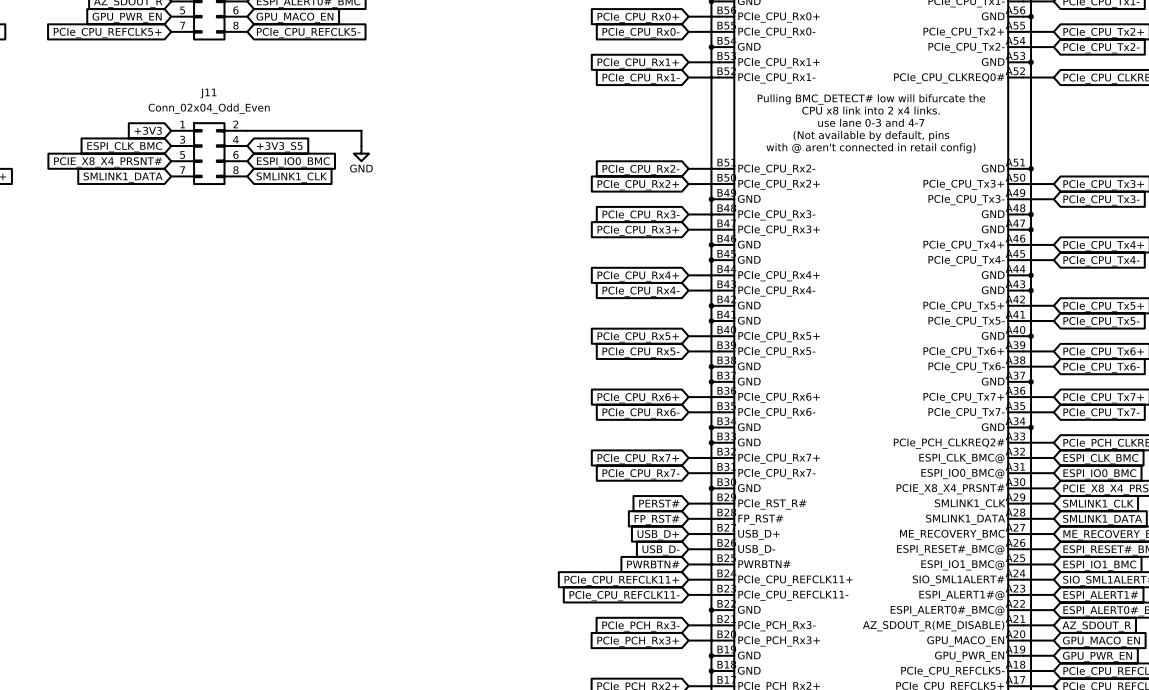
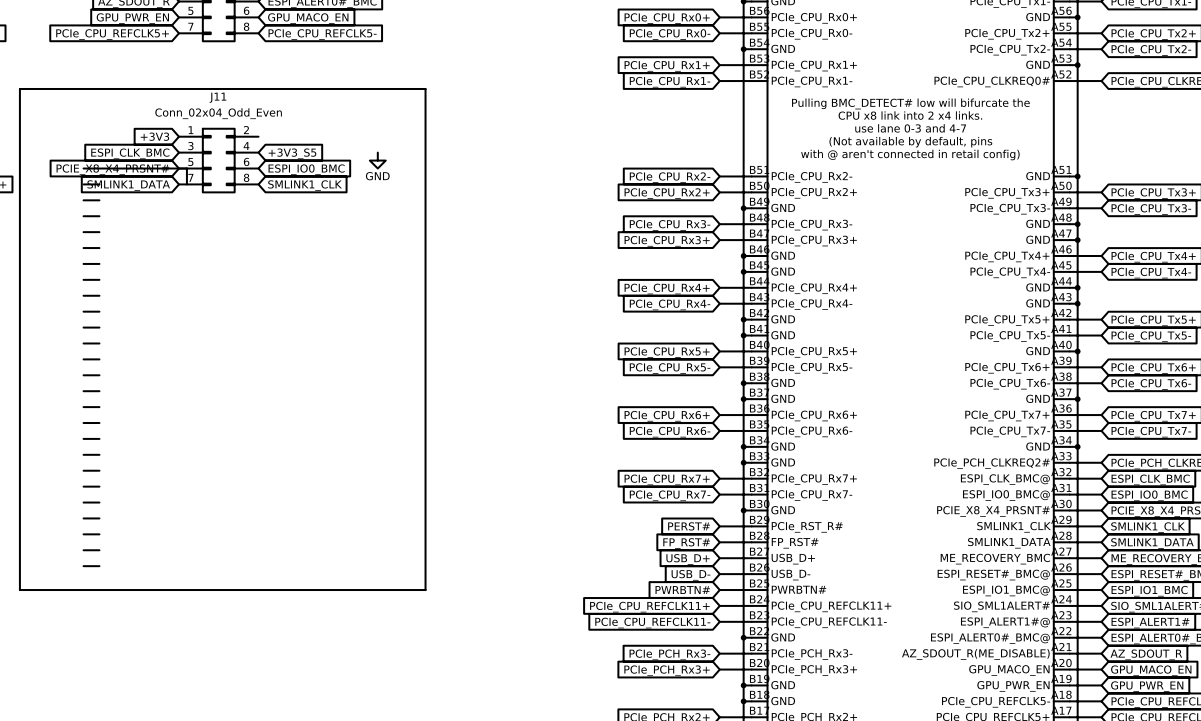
line: none -> (19, 88) (425, 88) (425, 590) (19, 590) (19, 88)
wire: (247, 130) (361, 130) (361, 146) -> none
wire: none -> (83, 168) (186, 168) (186, 184)
wire: none -> (83, 184) (99, 184)
wire: none -> (83, 200) (99, 200)
wire: none -> (83, 216) (99, 216)
wire: none -> (83, 232) (99, 232)
wire: none -> (83, 248) (99, 248)
wire: none -> (83, 263) (99, 263)
wire: none -> (83, 279) (99, 279)
wire: none -> (83, 295) (99, 295)
wire: none -> (83, 311) (99, 311)
wire: none -> (83, 327) (99, 327)
wire: none -> (83, 343) (99, 343)
wire: none -> (83, 359) (99, 359)
wire: none -> (83, 375) (99, 375)
wire: none -> (83, 391) (99, 391)
wire: none -> (83, 407) (99, 407)
wire: none -> (83, 423) (99, 423)
wire: none -> (83, 438) (99, 438)
wire: none -> (83, 454) (99, 454)
wire: none -> (83, 470) (99, 470)
wire: none -> (83, 486) (99, 486)
wire: none -> (83, 502) (99, 502)
wire: none -> (83, 518) (99, 518)
wire: none -> (83, 534) (99, 534)
wire: none -> (83, 550) (99, 550)
wire: none -> (83, 566) (99, 566)

